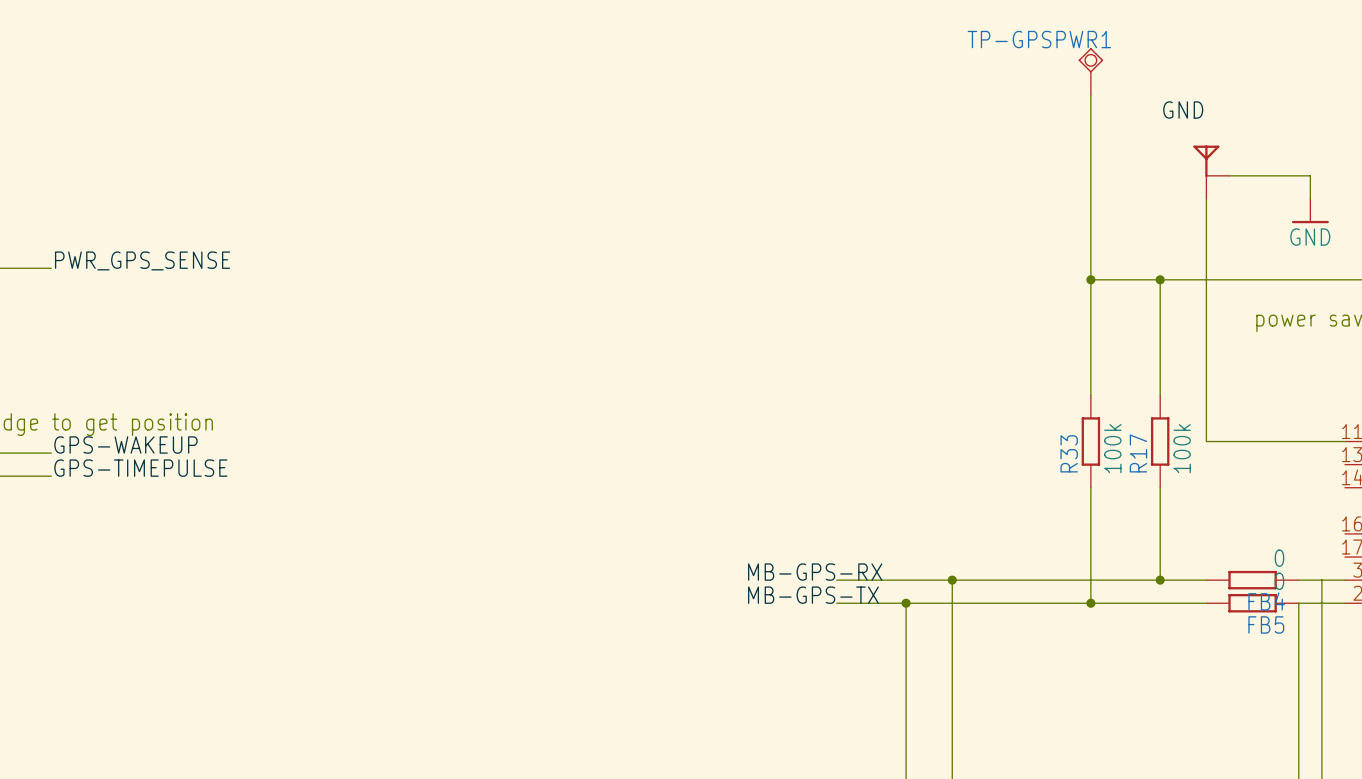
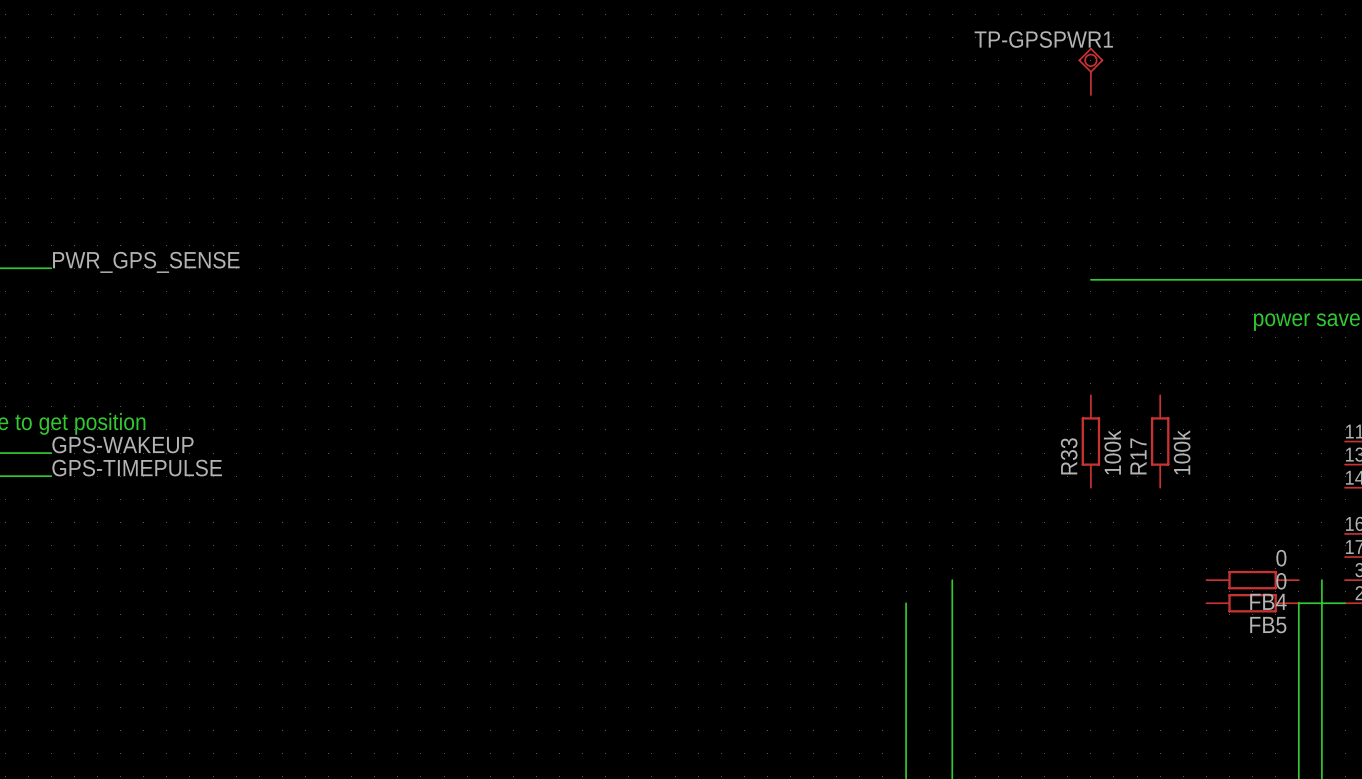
wire: (1090, 94) (1090, 395) -> none
label: GND (1183, 110) -> none
part: (1211, 172) -> none
wire: (1229, 175) (1310, 175) (1310, 198) -> none
wire: (1206, 198) (1206, 441) (1345, 441) -> none
power symbol: GND (1310, 211) -> none
junction: (1090, 279) -> none
wire: (1160, 279) (1160, 395) -> none
junction: (1160, 279) -> none
wire: (1090, 487) (1090, 603) -> none
wire: (1160, 487) (1160, 580) -> none
label: MB-GPS-RX (815, 572) -> none
wire: (836, 580) (1206, 580) -> none
junction: (952, 580) -> none
junction: (1160, 580) -> none
wire: (1298, 580) (1345, 580) -> none
label: MB-GPS-TX (813, 595) -> none
wire: (836, 603) (1206, 603) -> none
junction: (906, 603) -> none
junction: (1090, 603) -> none

